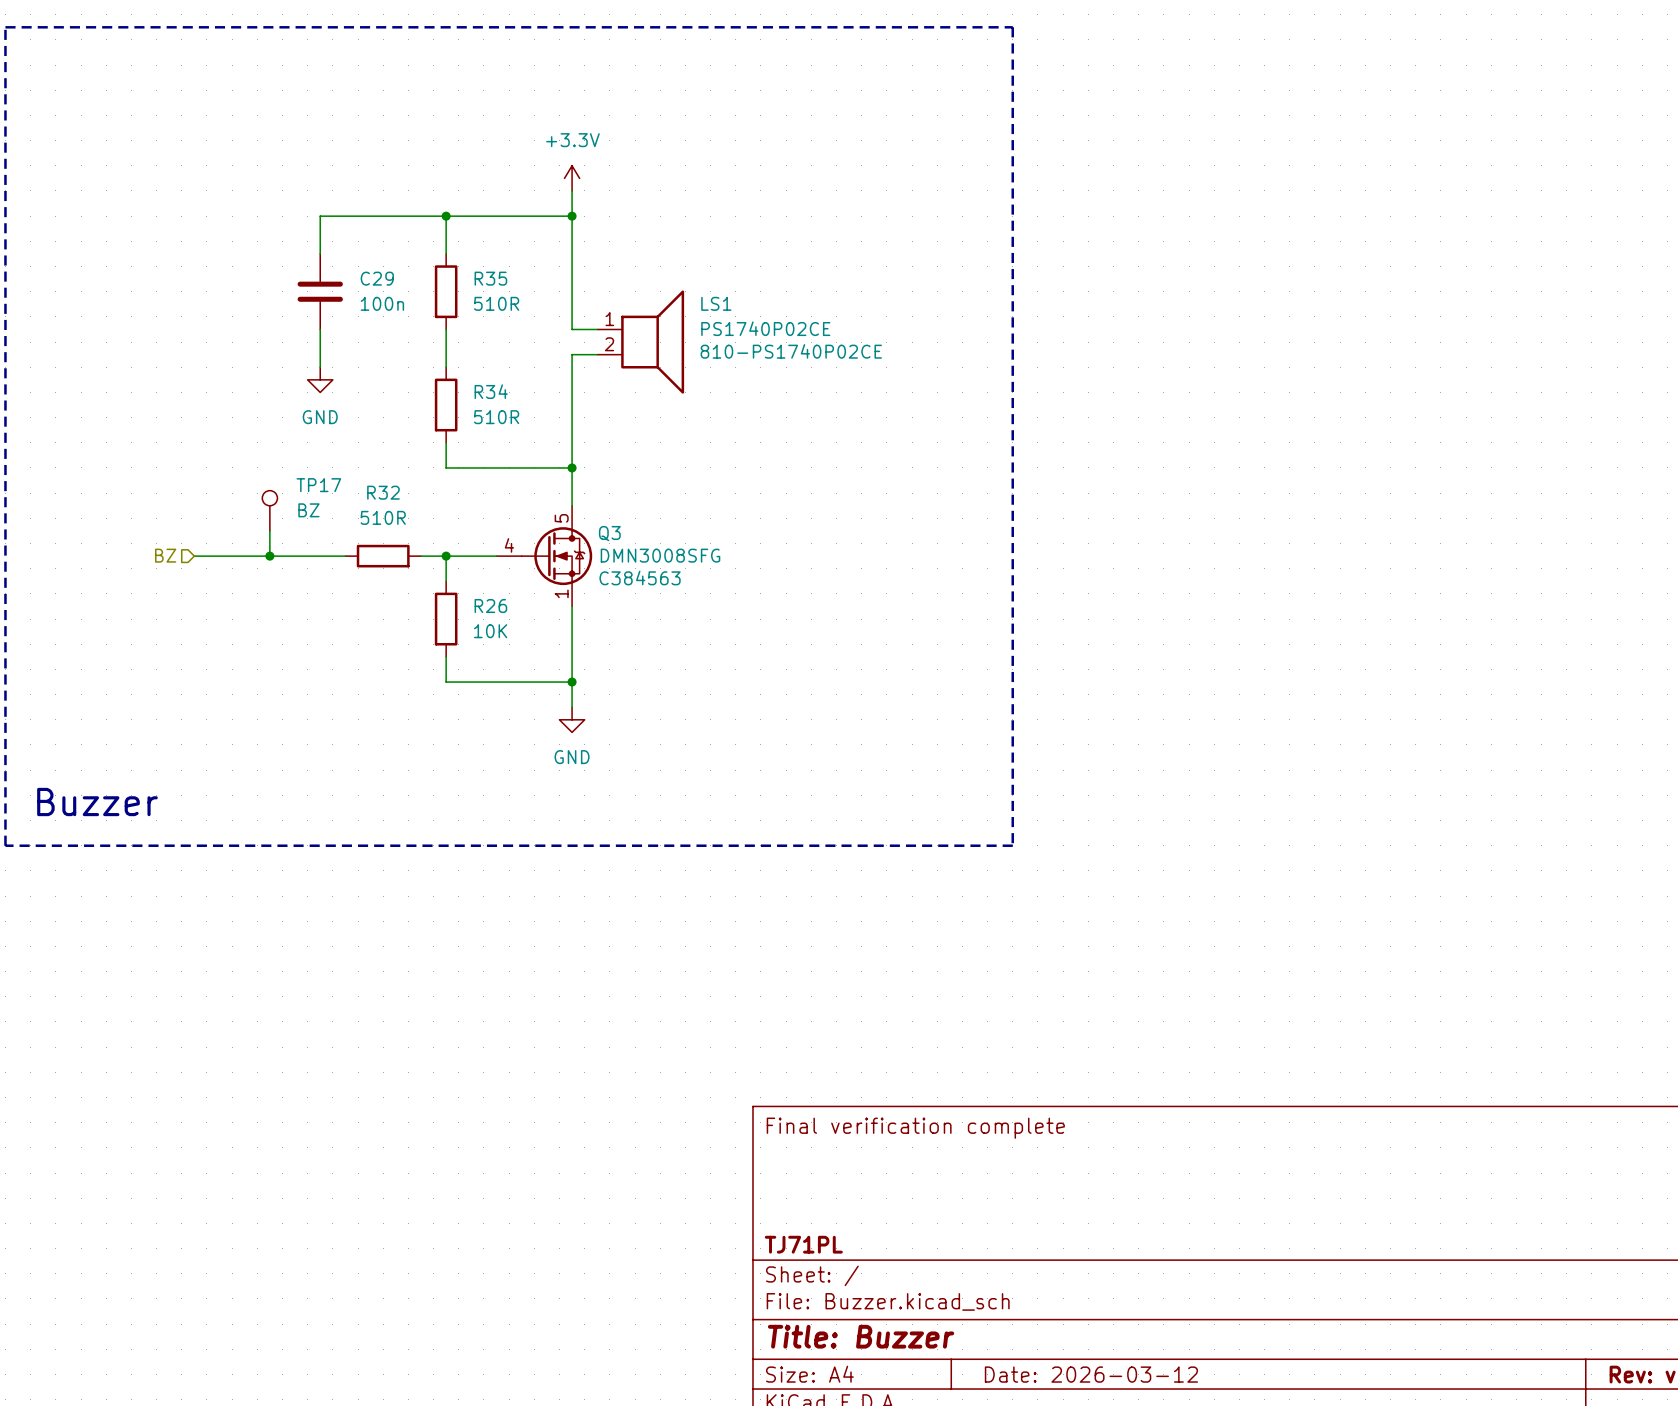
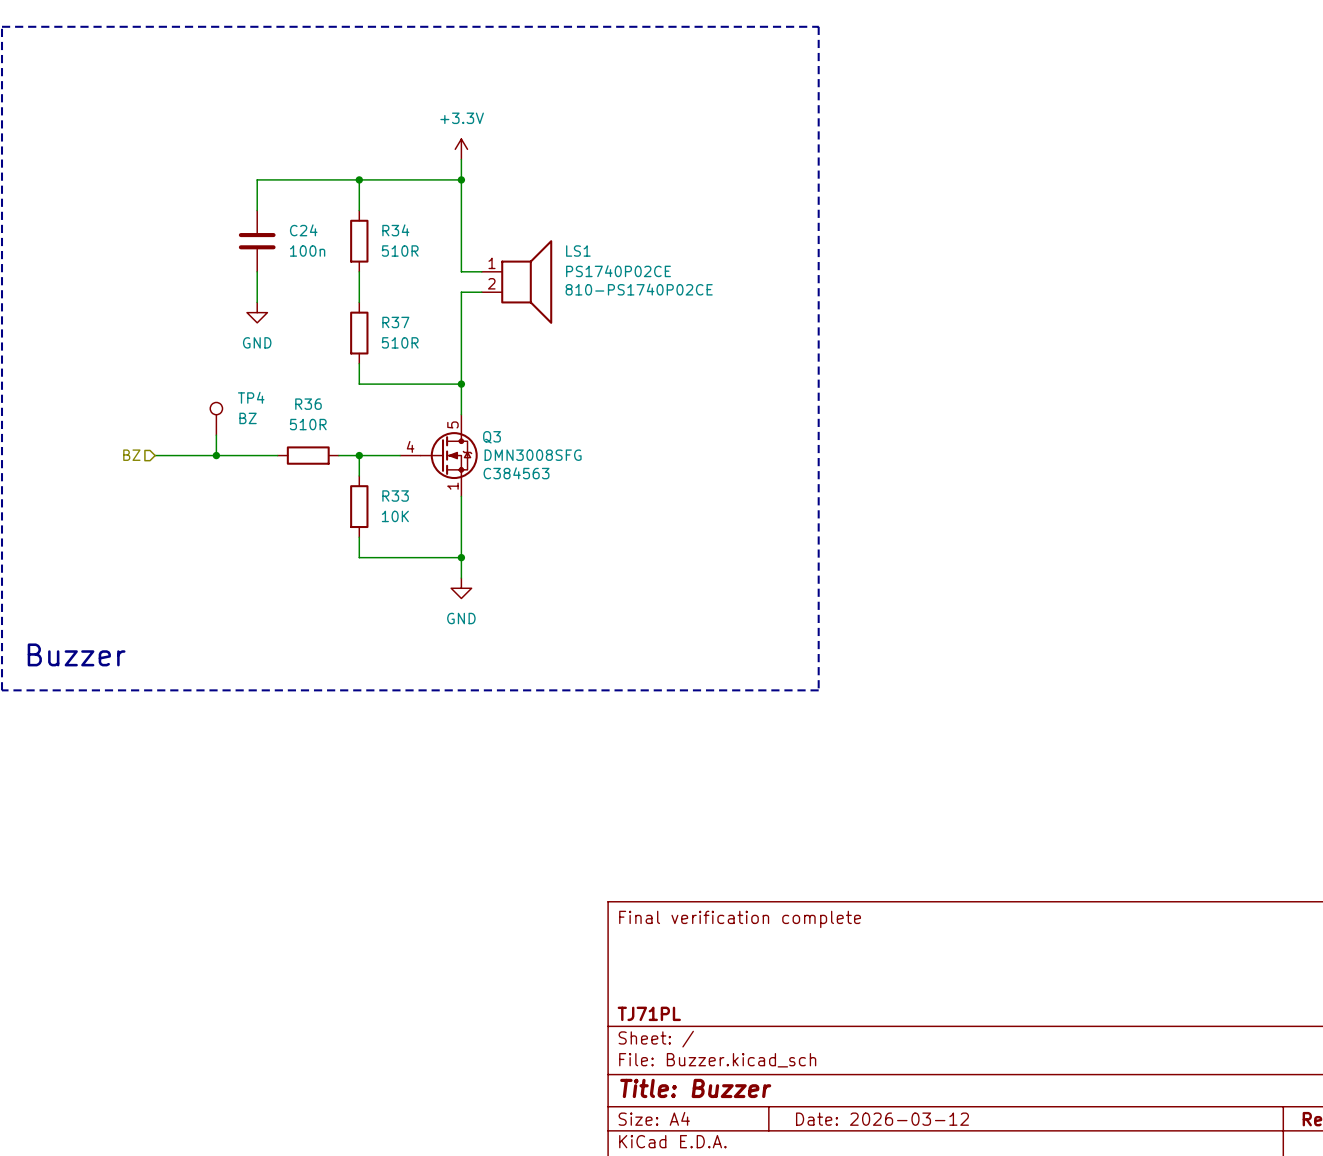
C29 name: C29 (377, 278) -> C24 (303, 230)
R35 name: R35 (490, 278) -> R34 (395, 230)
R34 name: R34 (491, 391) -> R37 (395, 322)
TP17 name: TP17 (318, 485) -> TP4 (251, 397)
R32 name: R32 (383, 492) -> R36 (308, 404)
R26 name: R26 (490, 606) -> R33 (395, 496)

